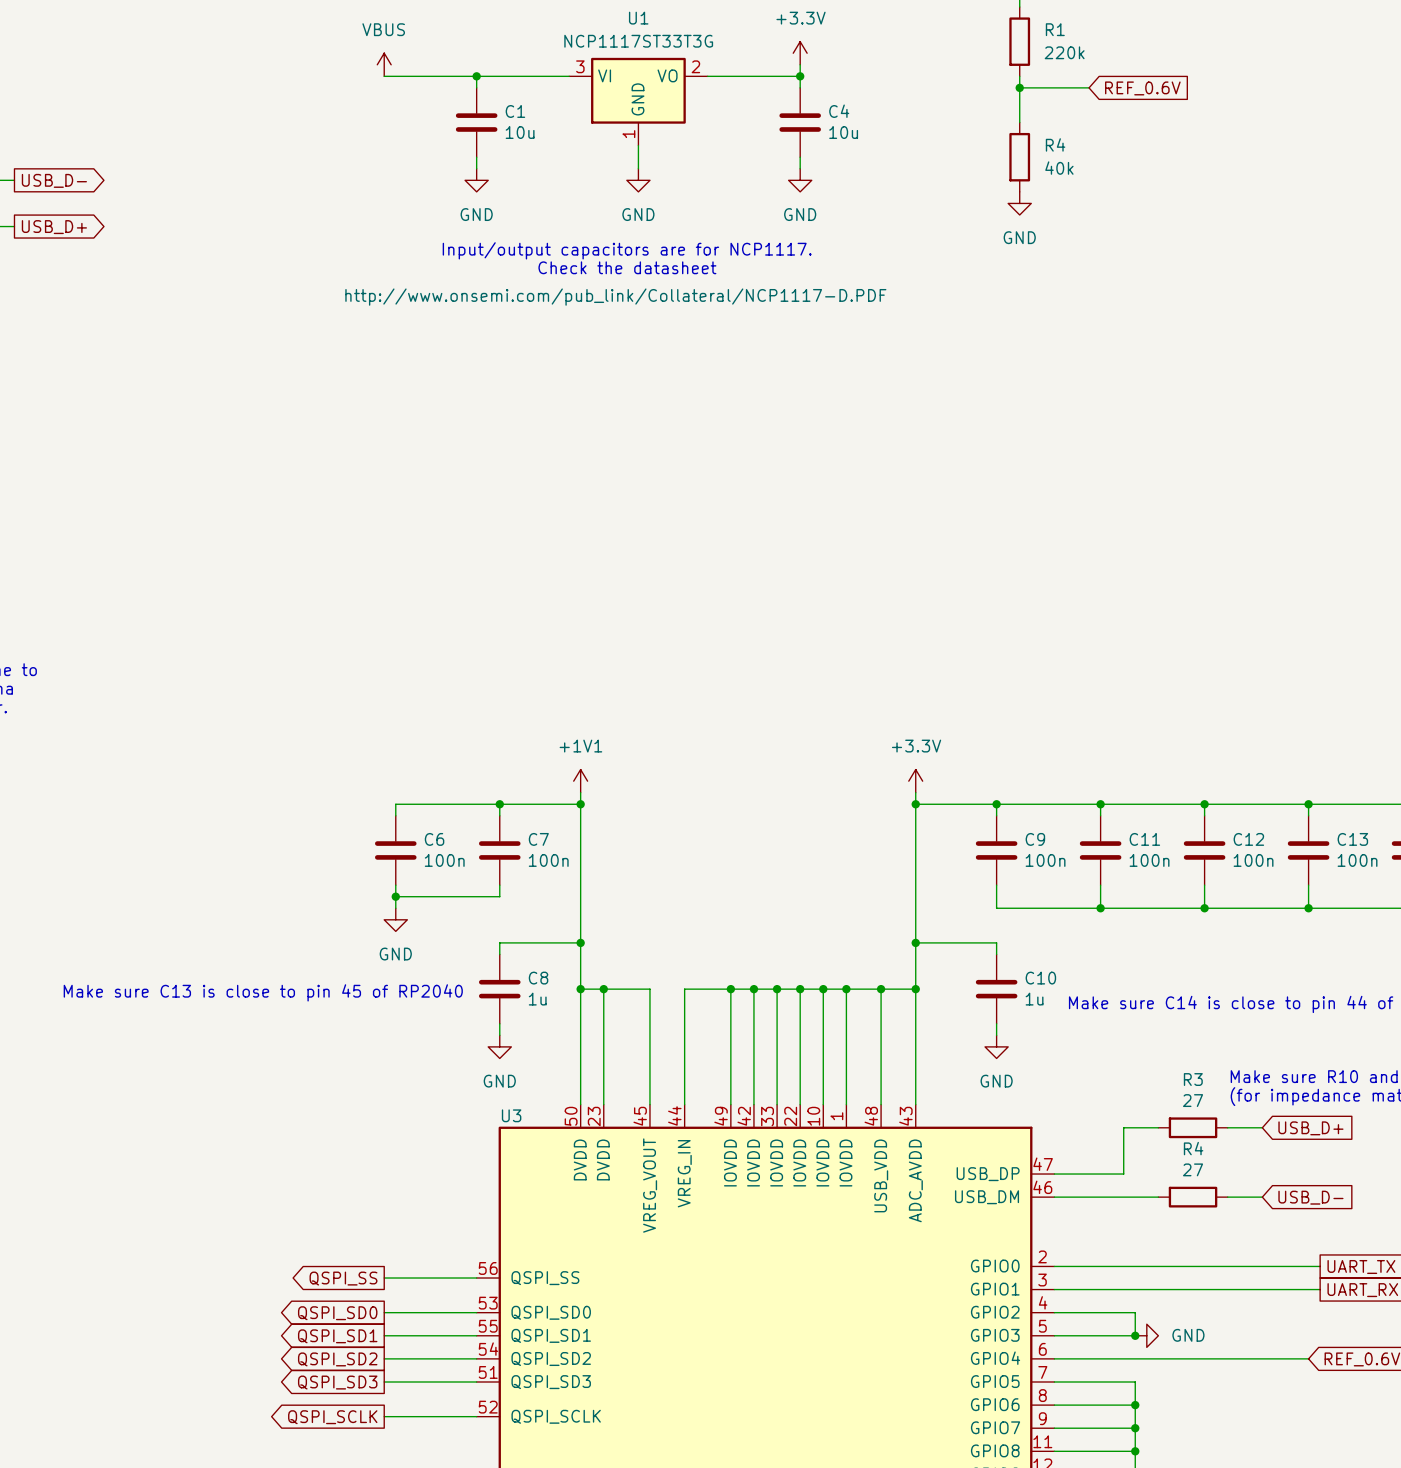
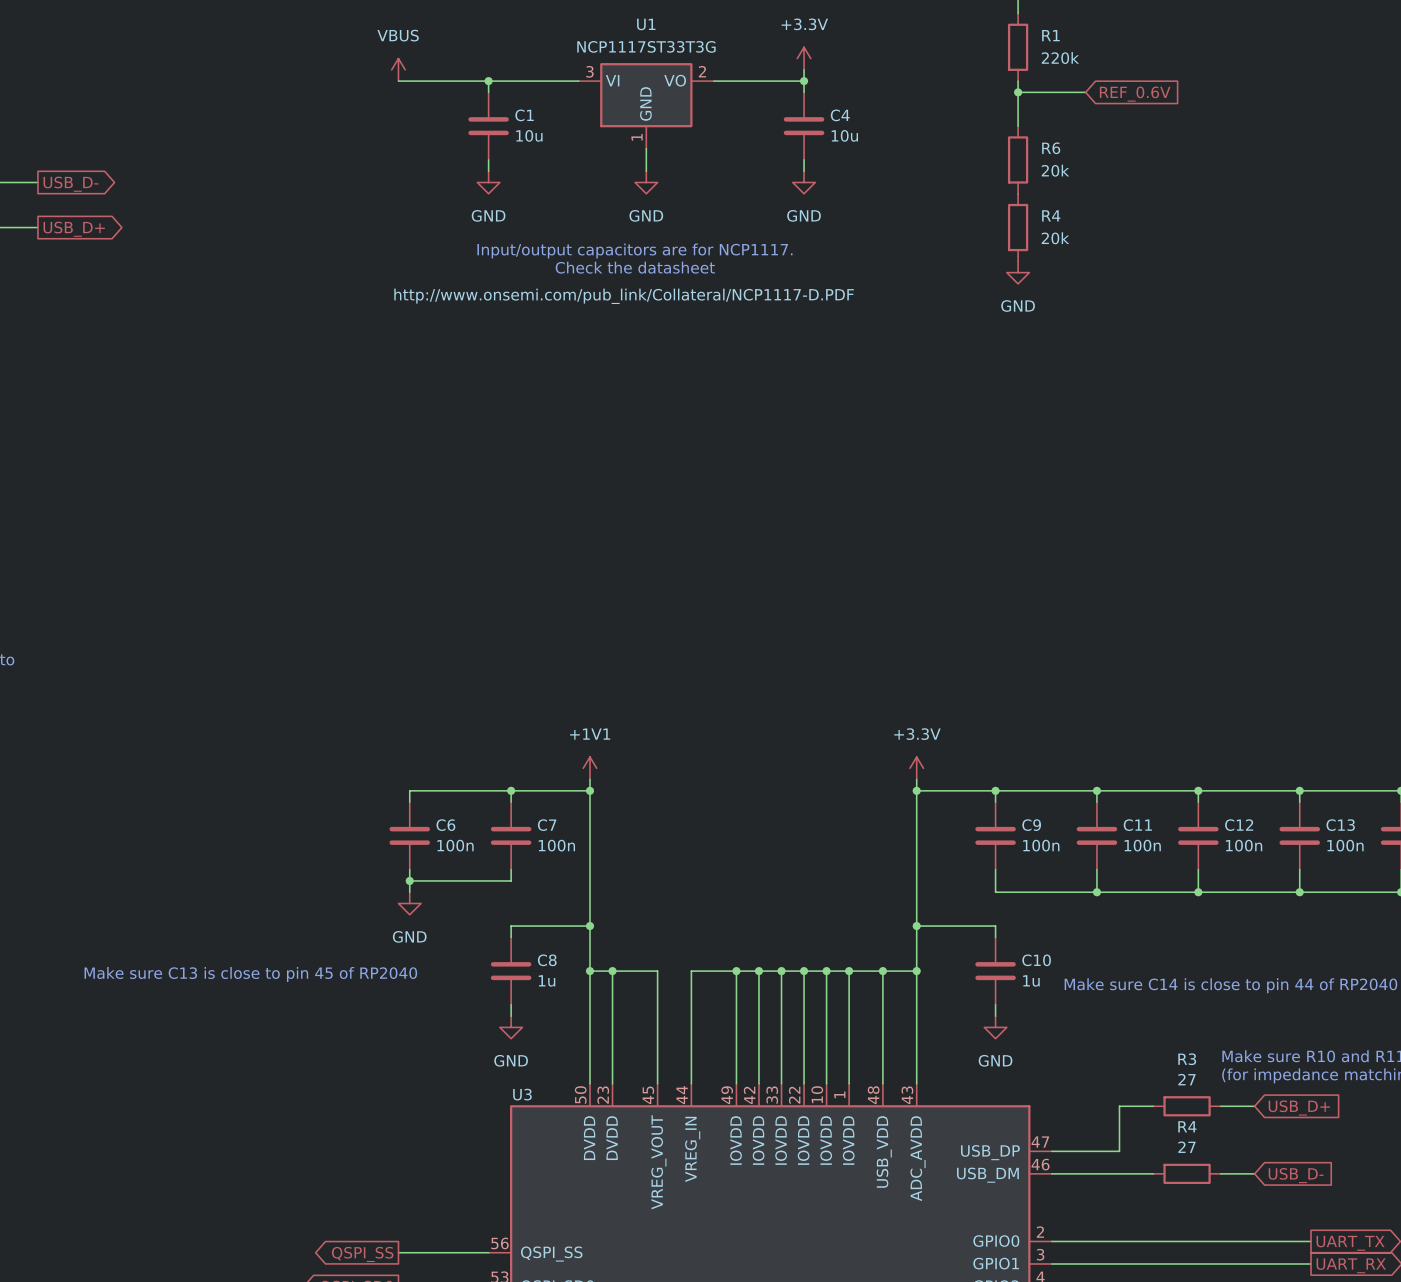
R4 name: R4 (1055, 144) -> R6 (1051, 148)
R4 value: 40k (1059, 168) -> 20k (1055, 170)
power symbol position: GND (1019, 203) -> GND (1018, 272)
R4: none -> 20k (1018, 227)

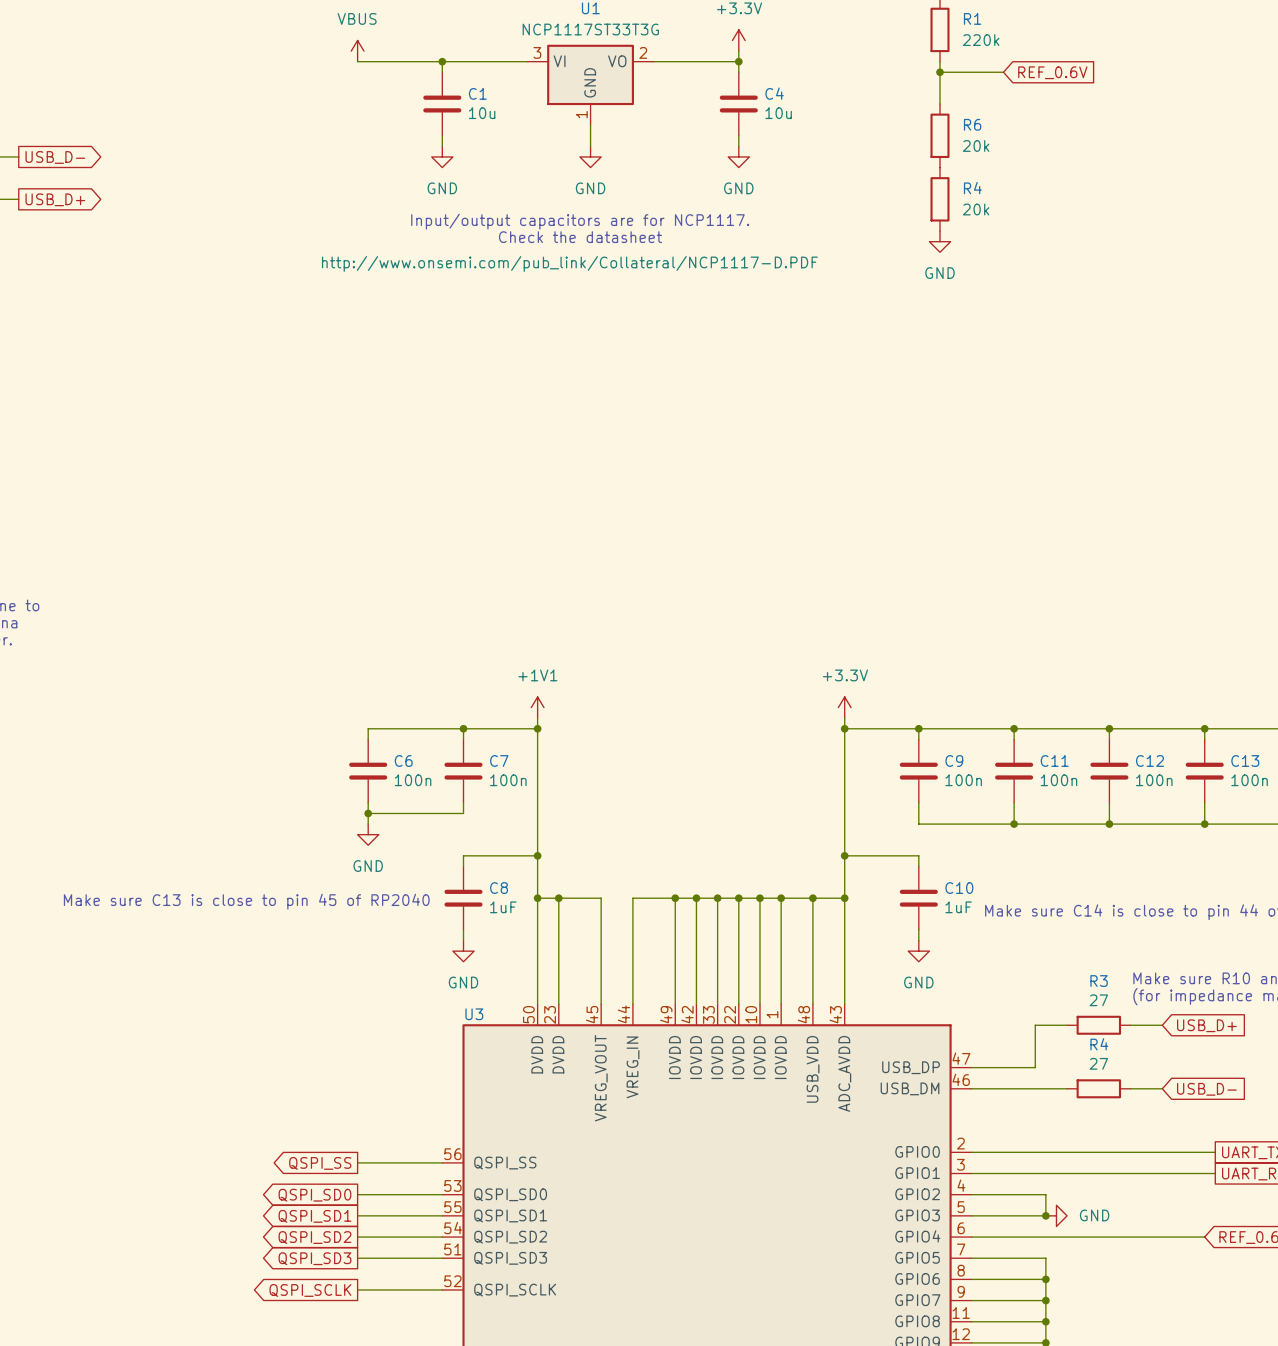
C8 value: 1u (547, 980) -> 1uF (503, 907)
C10 value: 1u (1031, 980) -> 1uF (958, 907)

